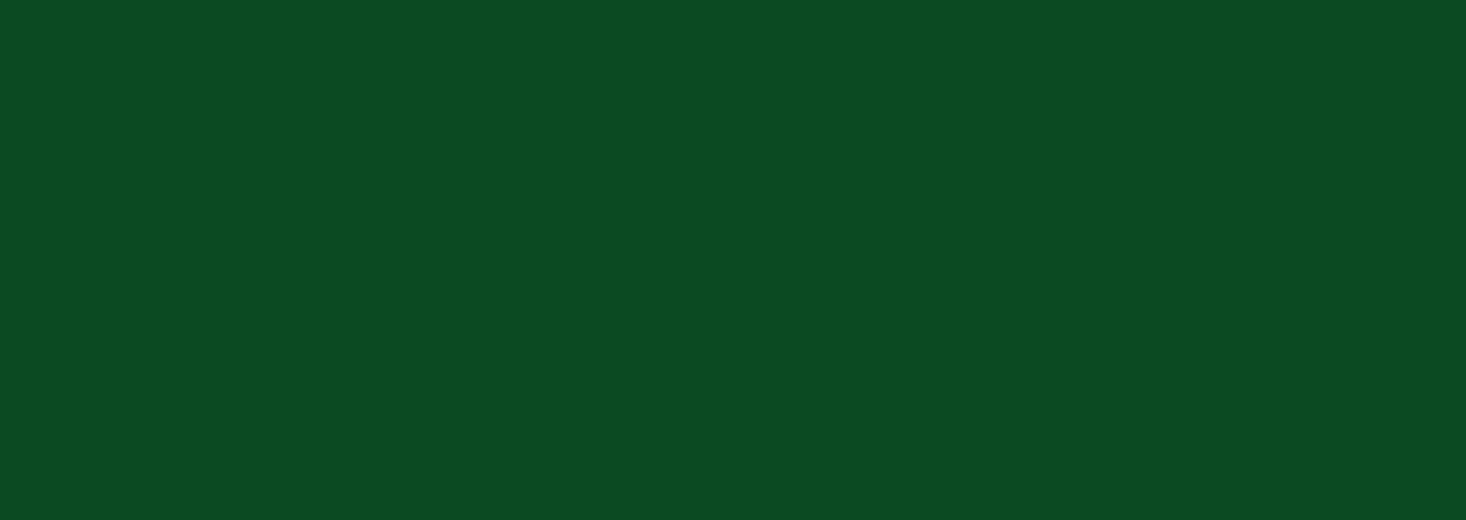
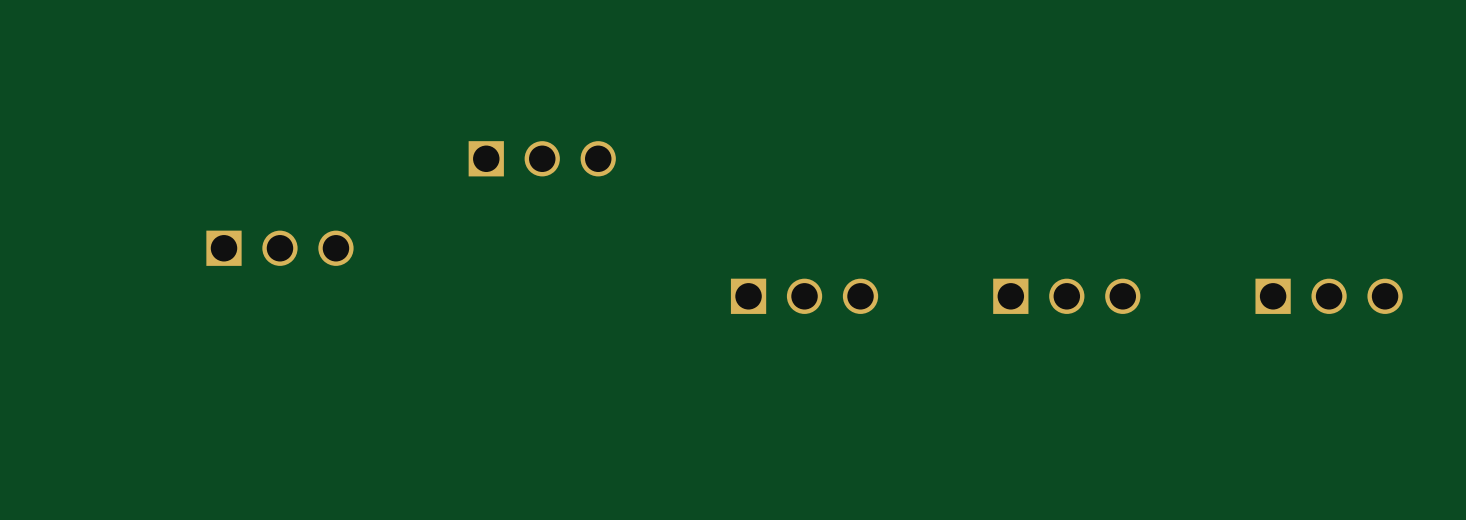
part: none -> (542, 158)
part: none -> (279, 248)
part: none -> (804, 296)
part: none -> (1066, 296)
part: none -> (1329, 296)

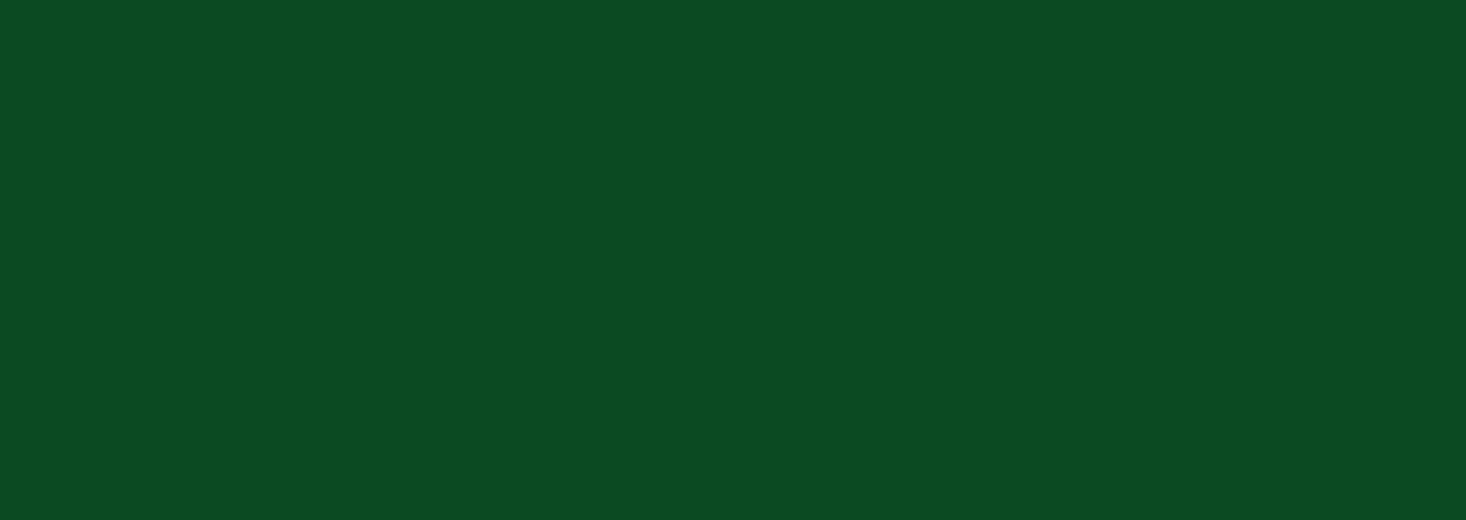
part: (542, 158) -> none
part: (279, 248) -> none
part: (804, 296) -> none
part: (1066, 296) -> none
part: (1329, 296) -> none

